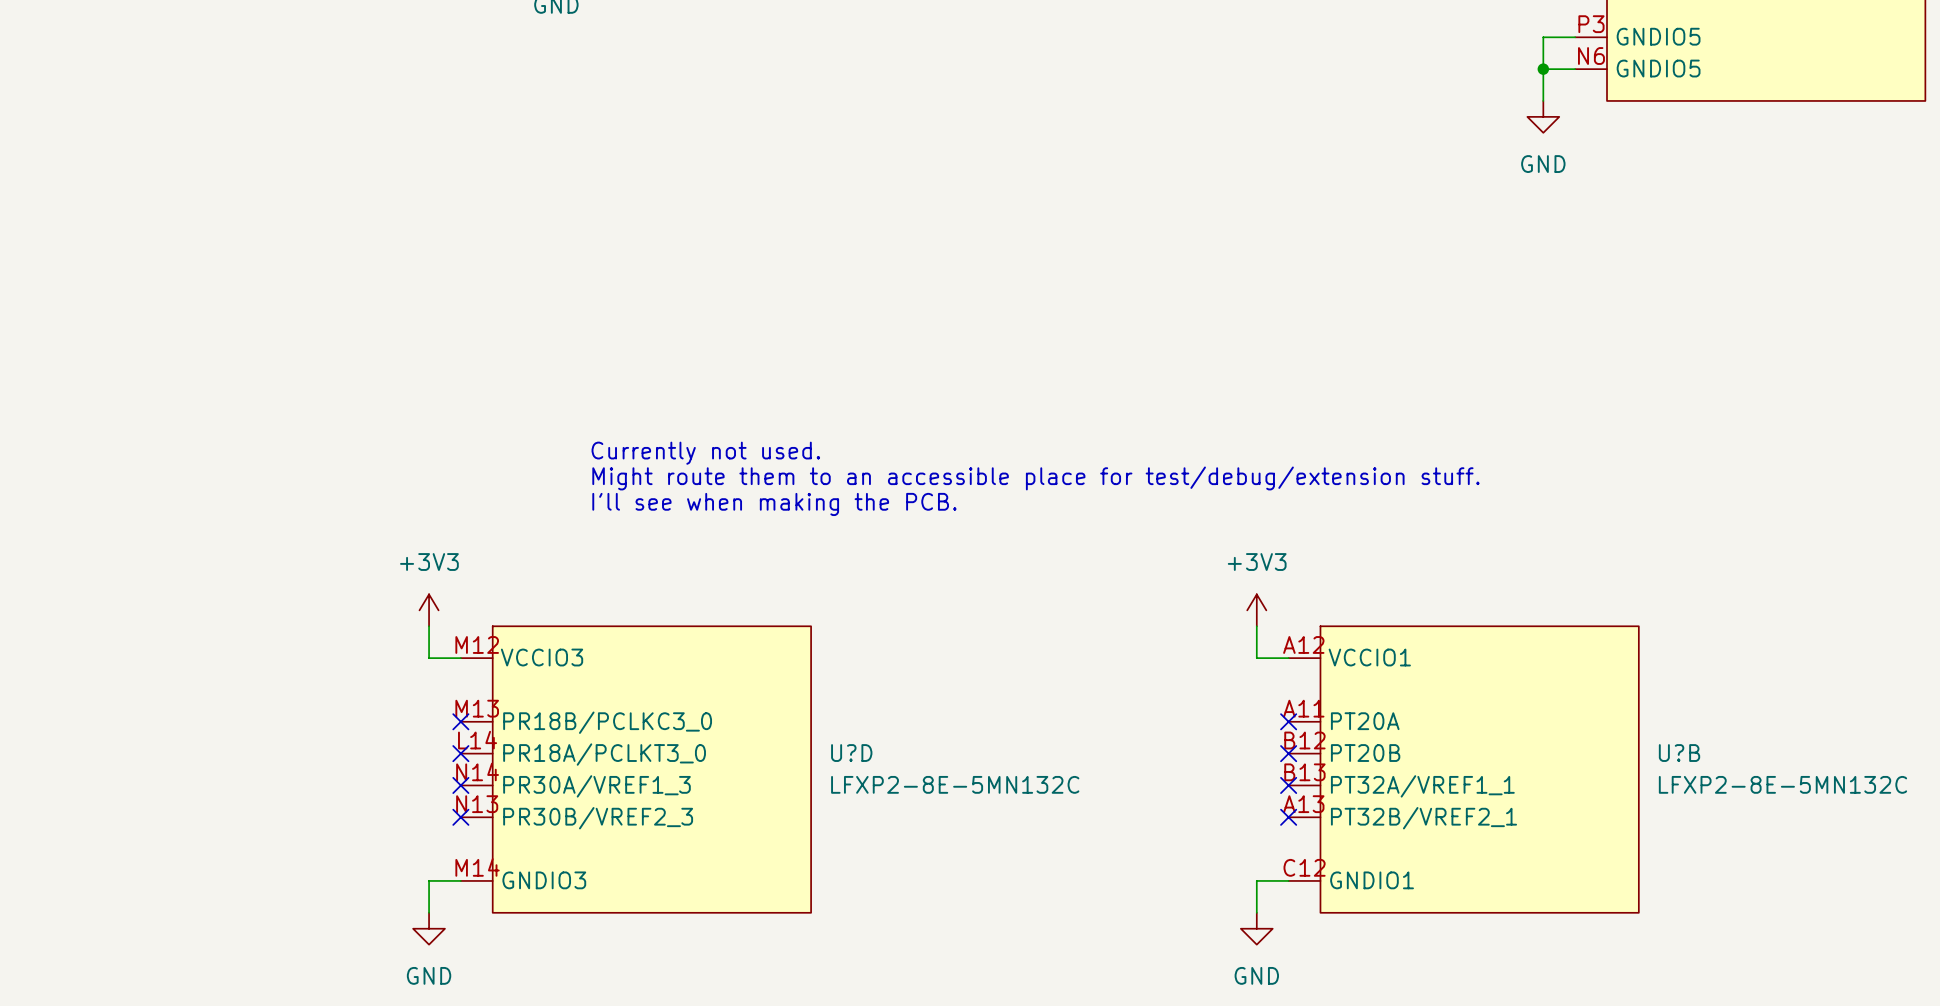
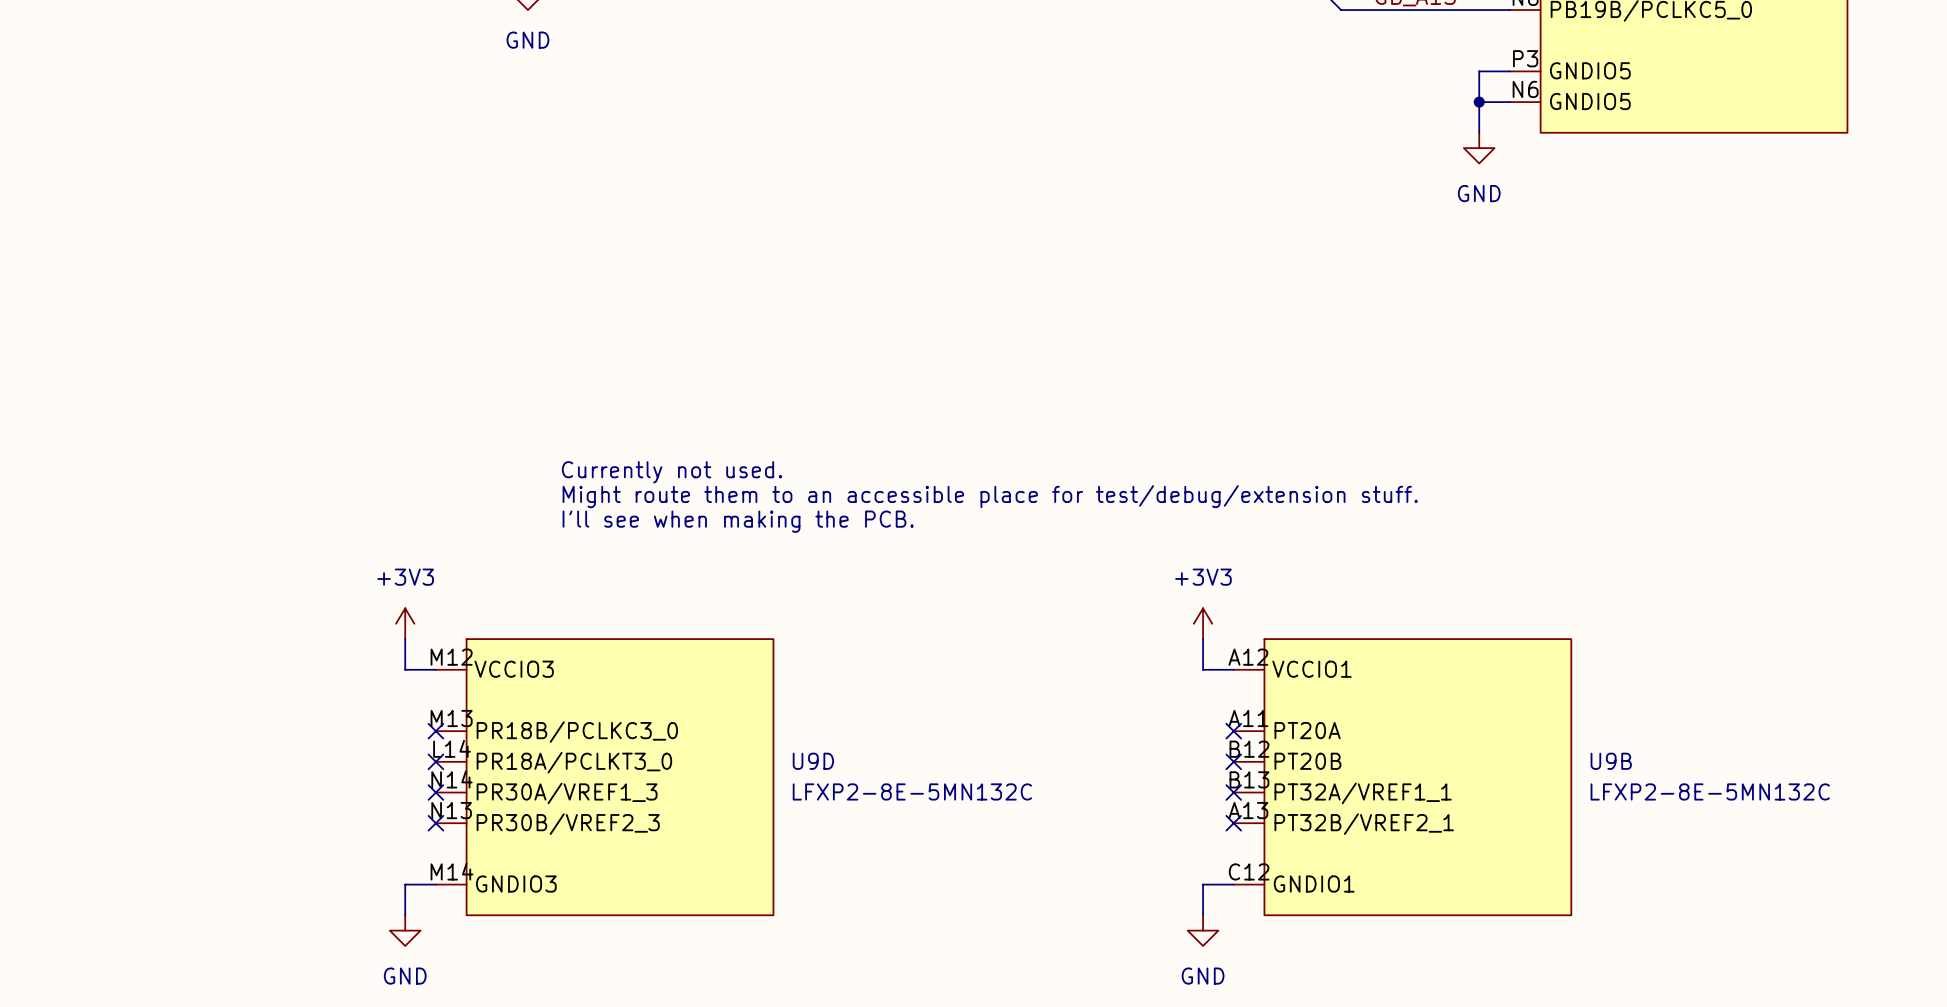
U?D name: U?D (851, 753) -> U9D (813, 761)
U?B name: U?B (1679, 753) -> U9B (1611, 761)

